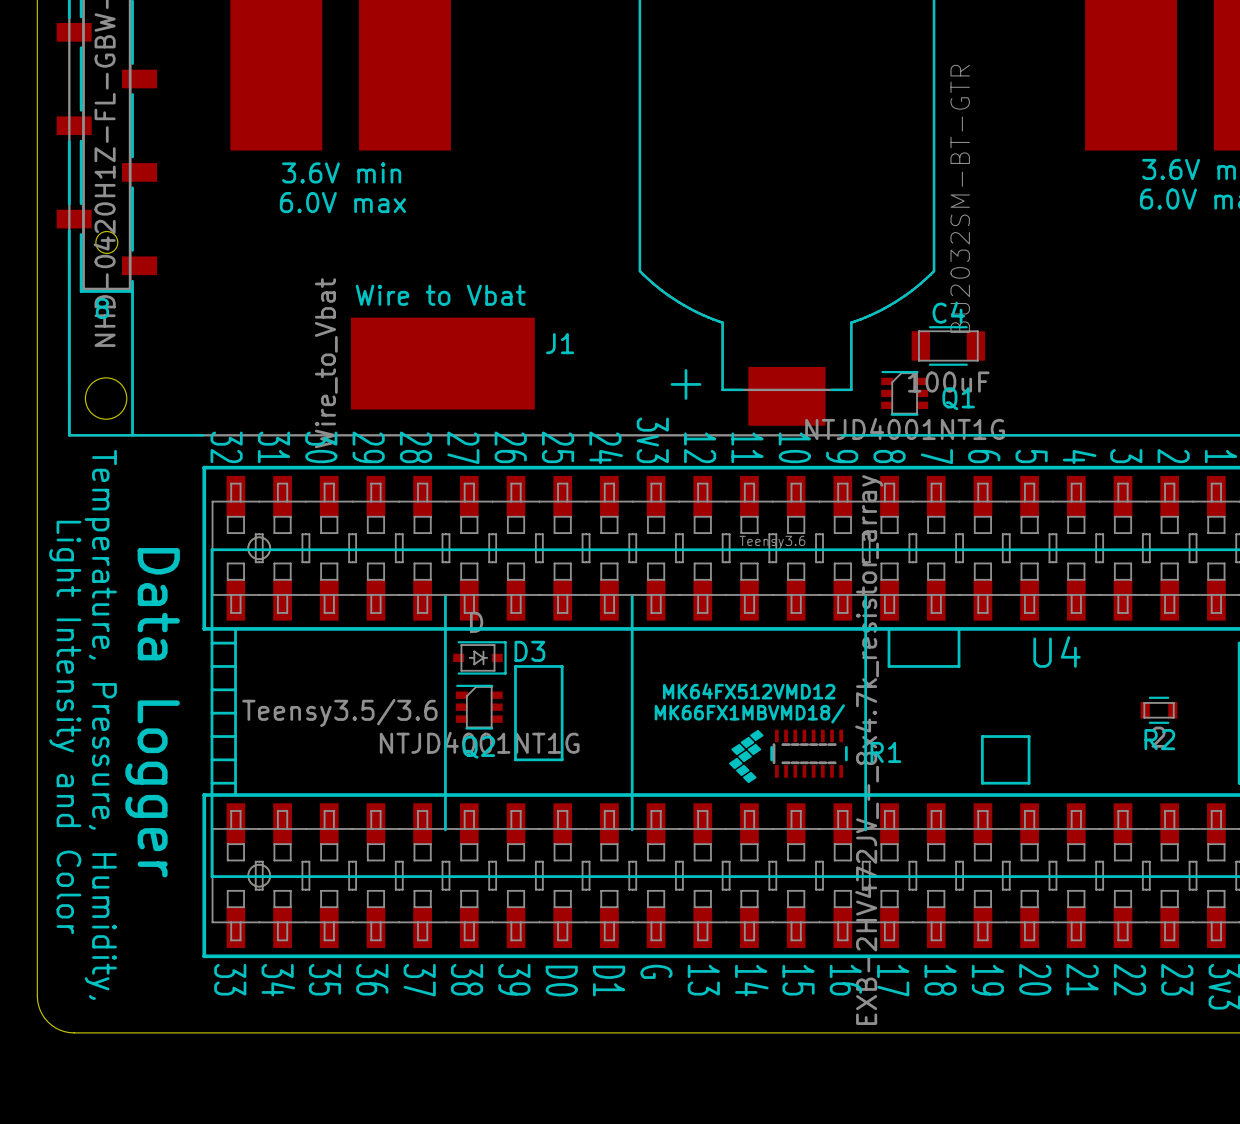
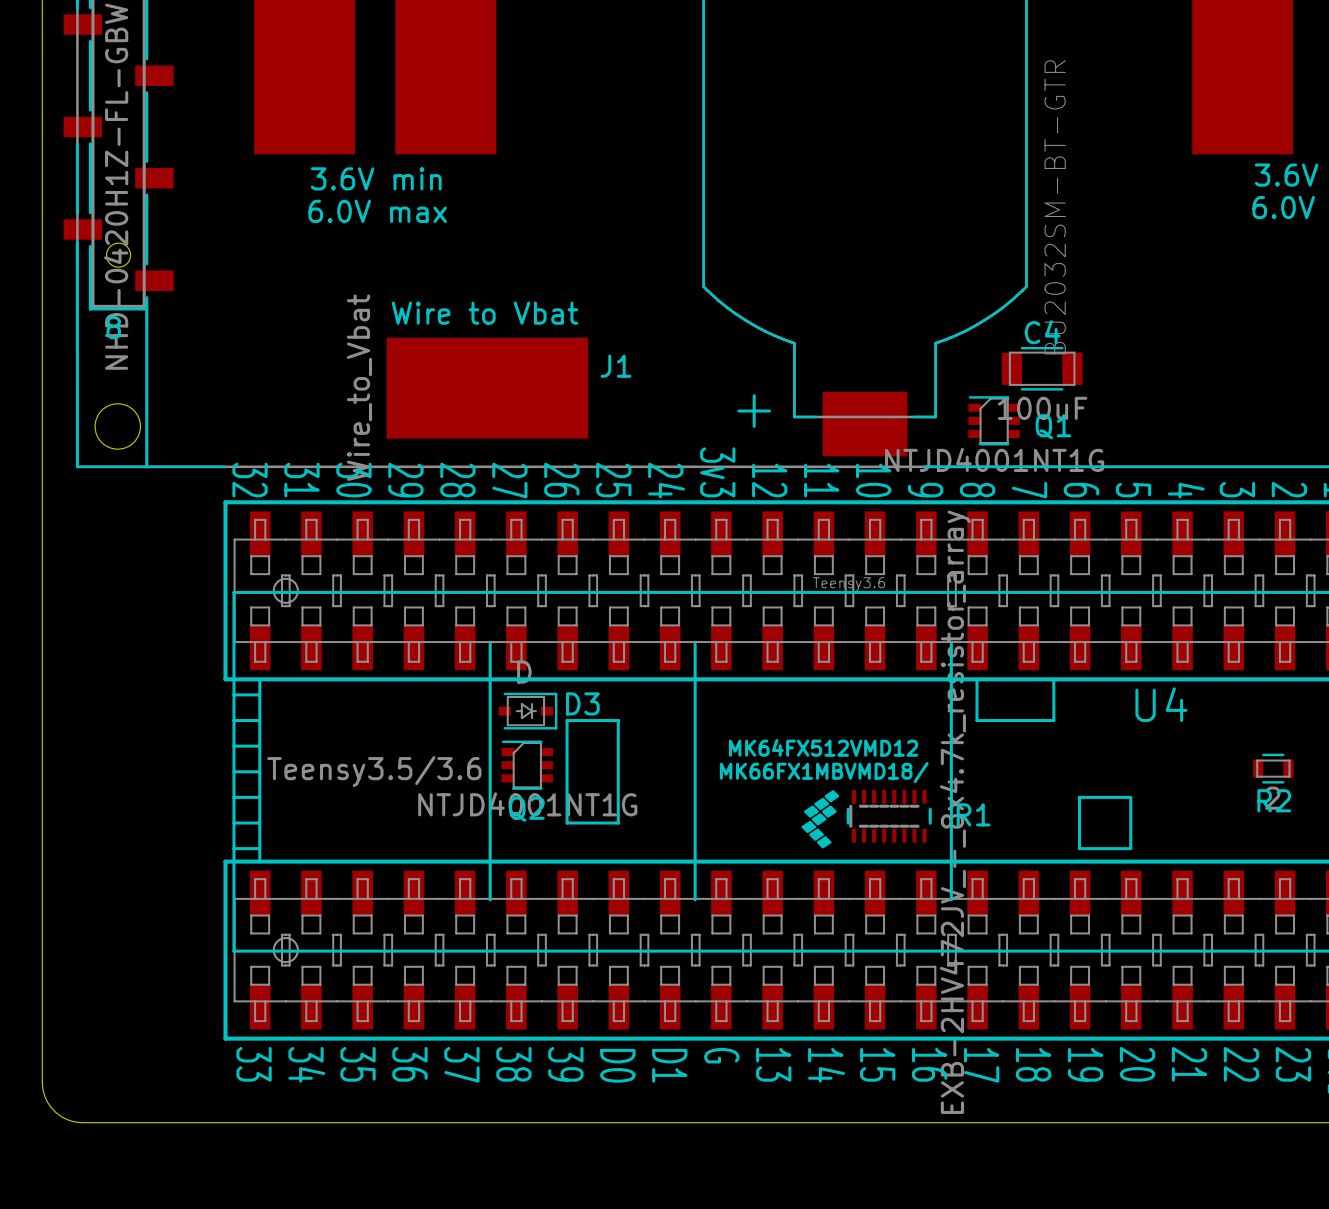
text: Data Logger (152, 712) -> none
text: Temperature, Pressure, Humidity, (100, 724) -> none
text: Light Intensity and Color (65, 727) -> none

